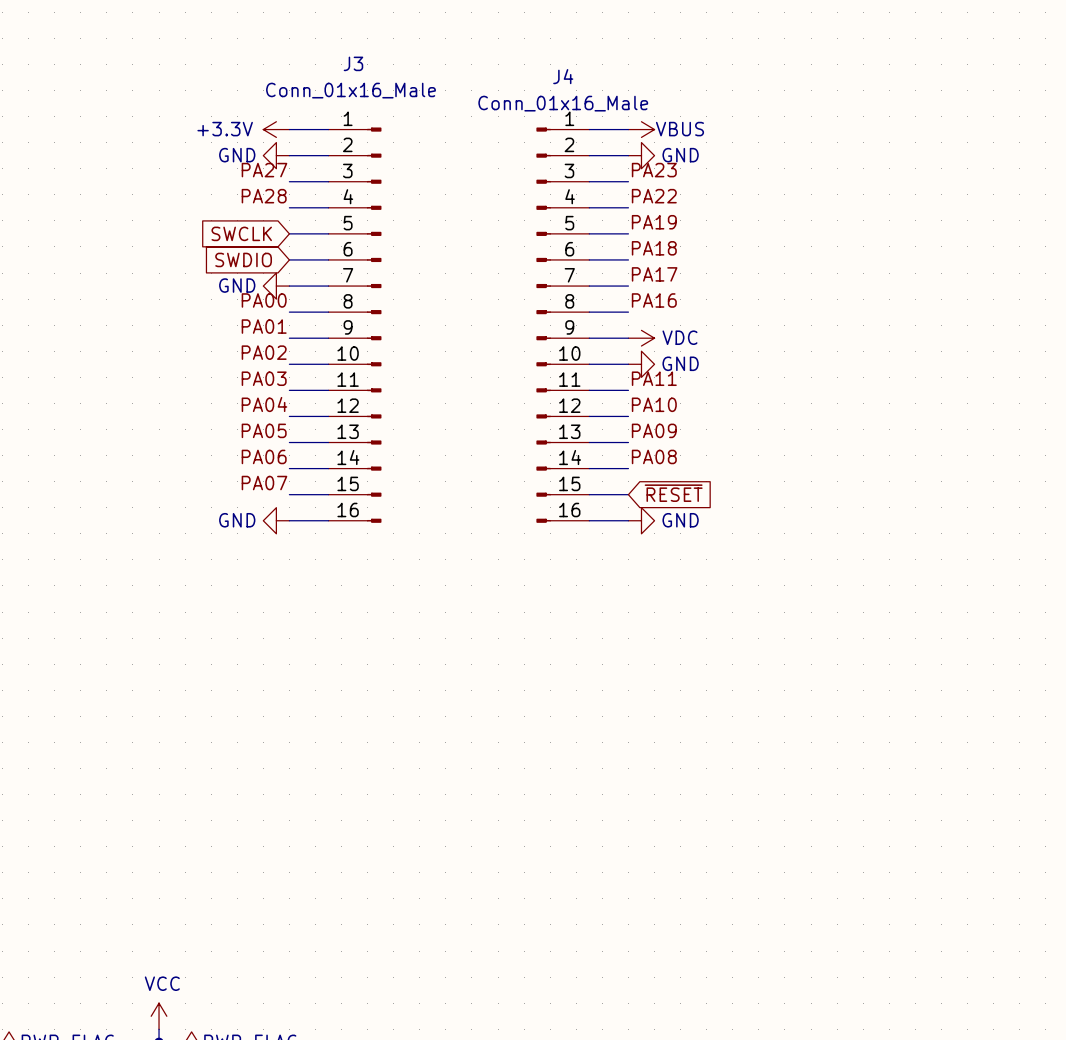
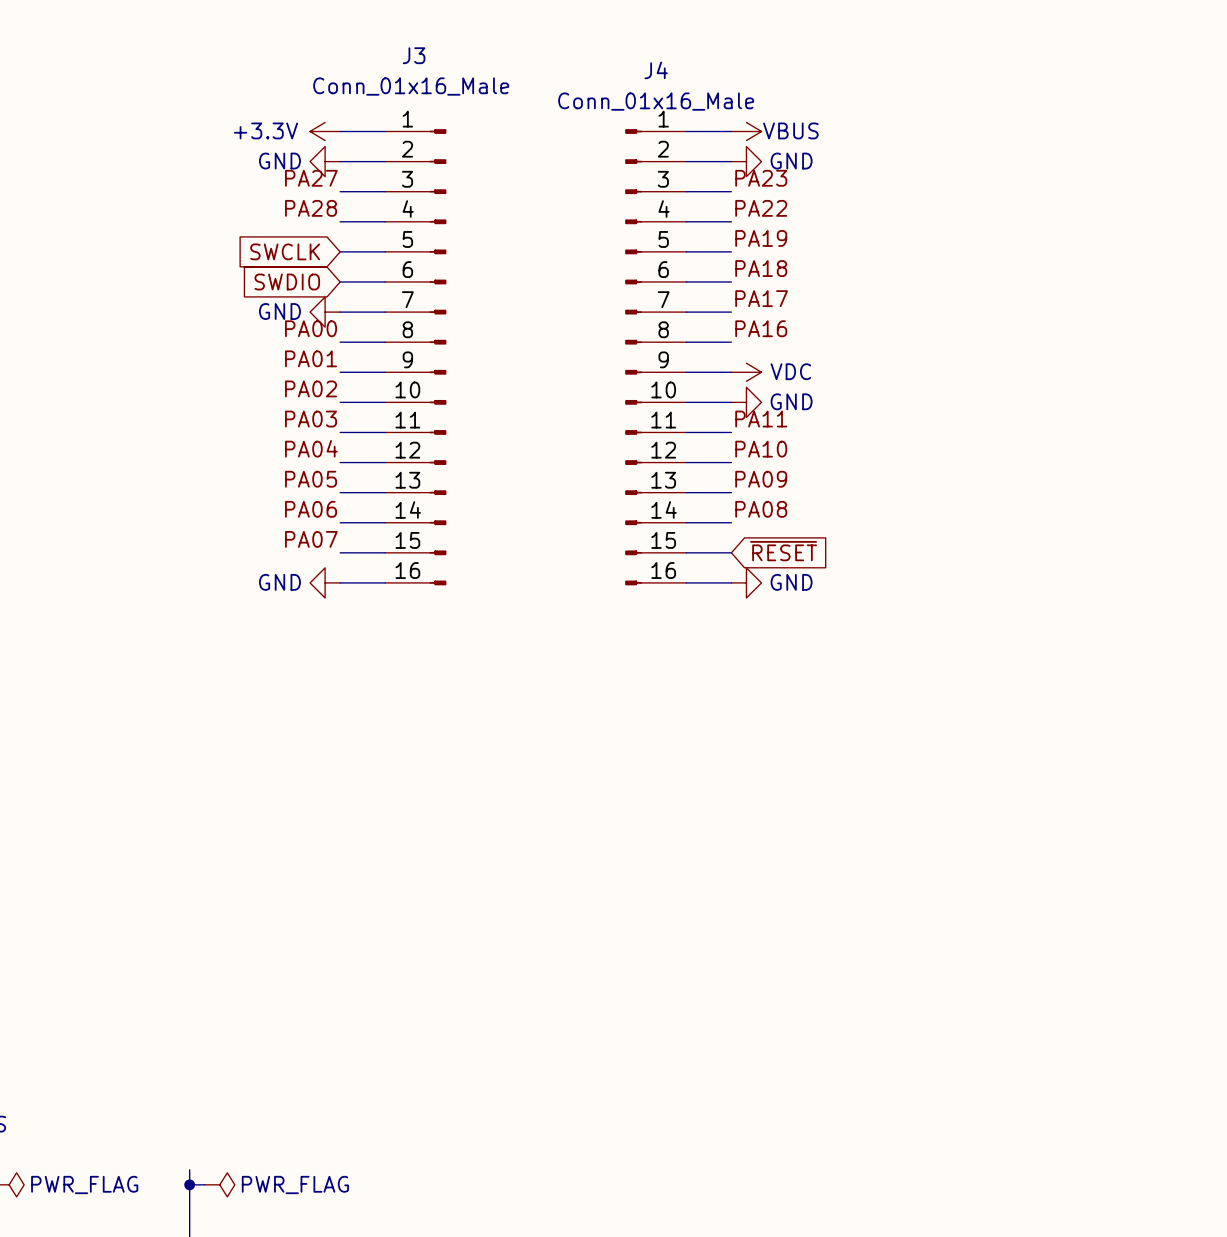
power symbol: VCC (159, 1016) -> none

